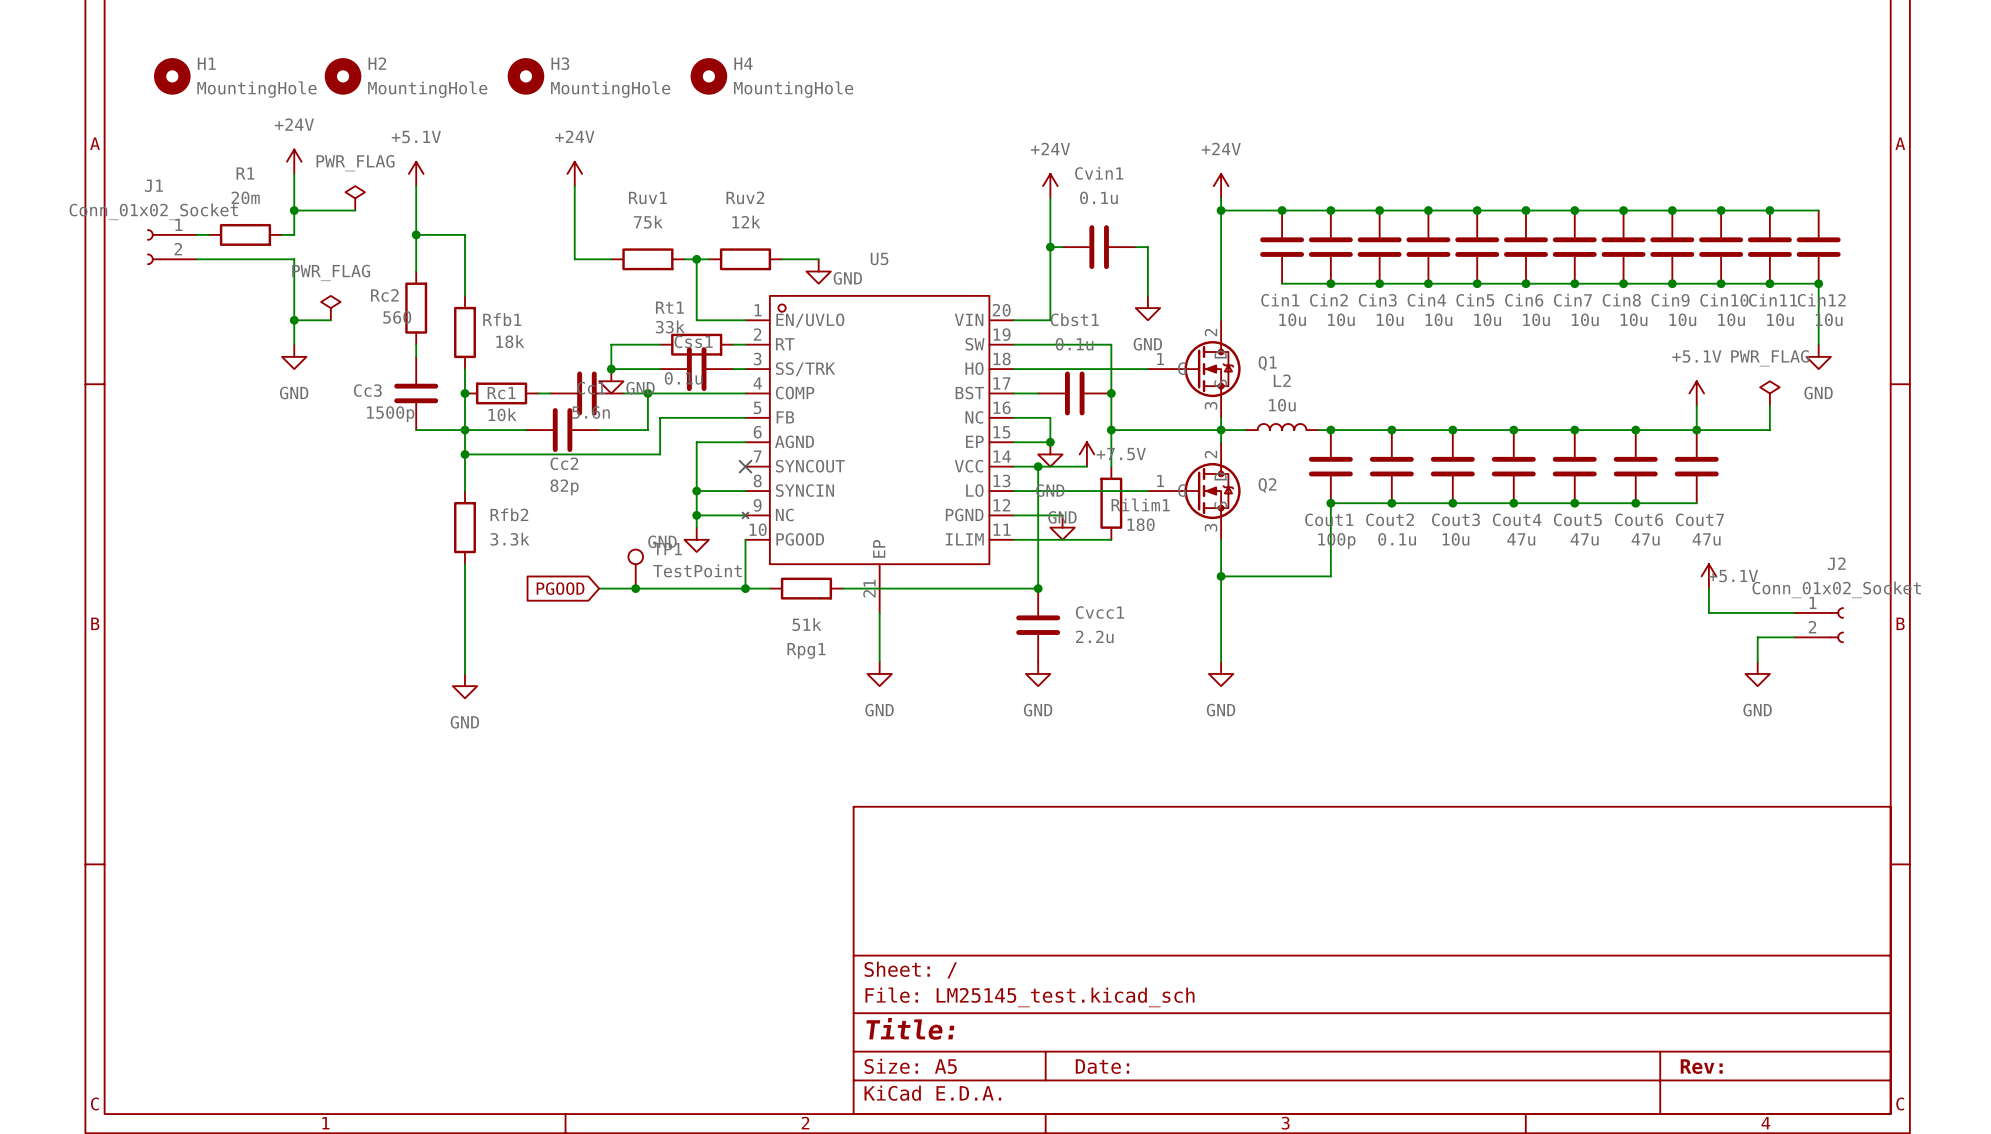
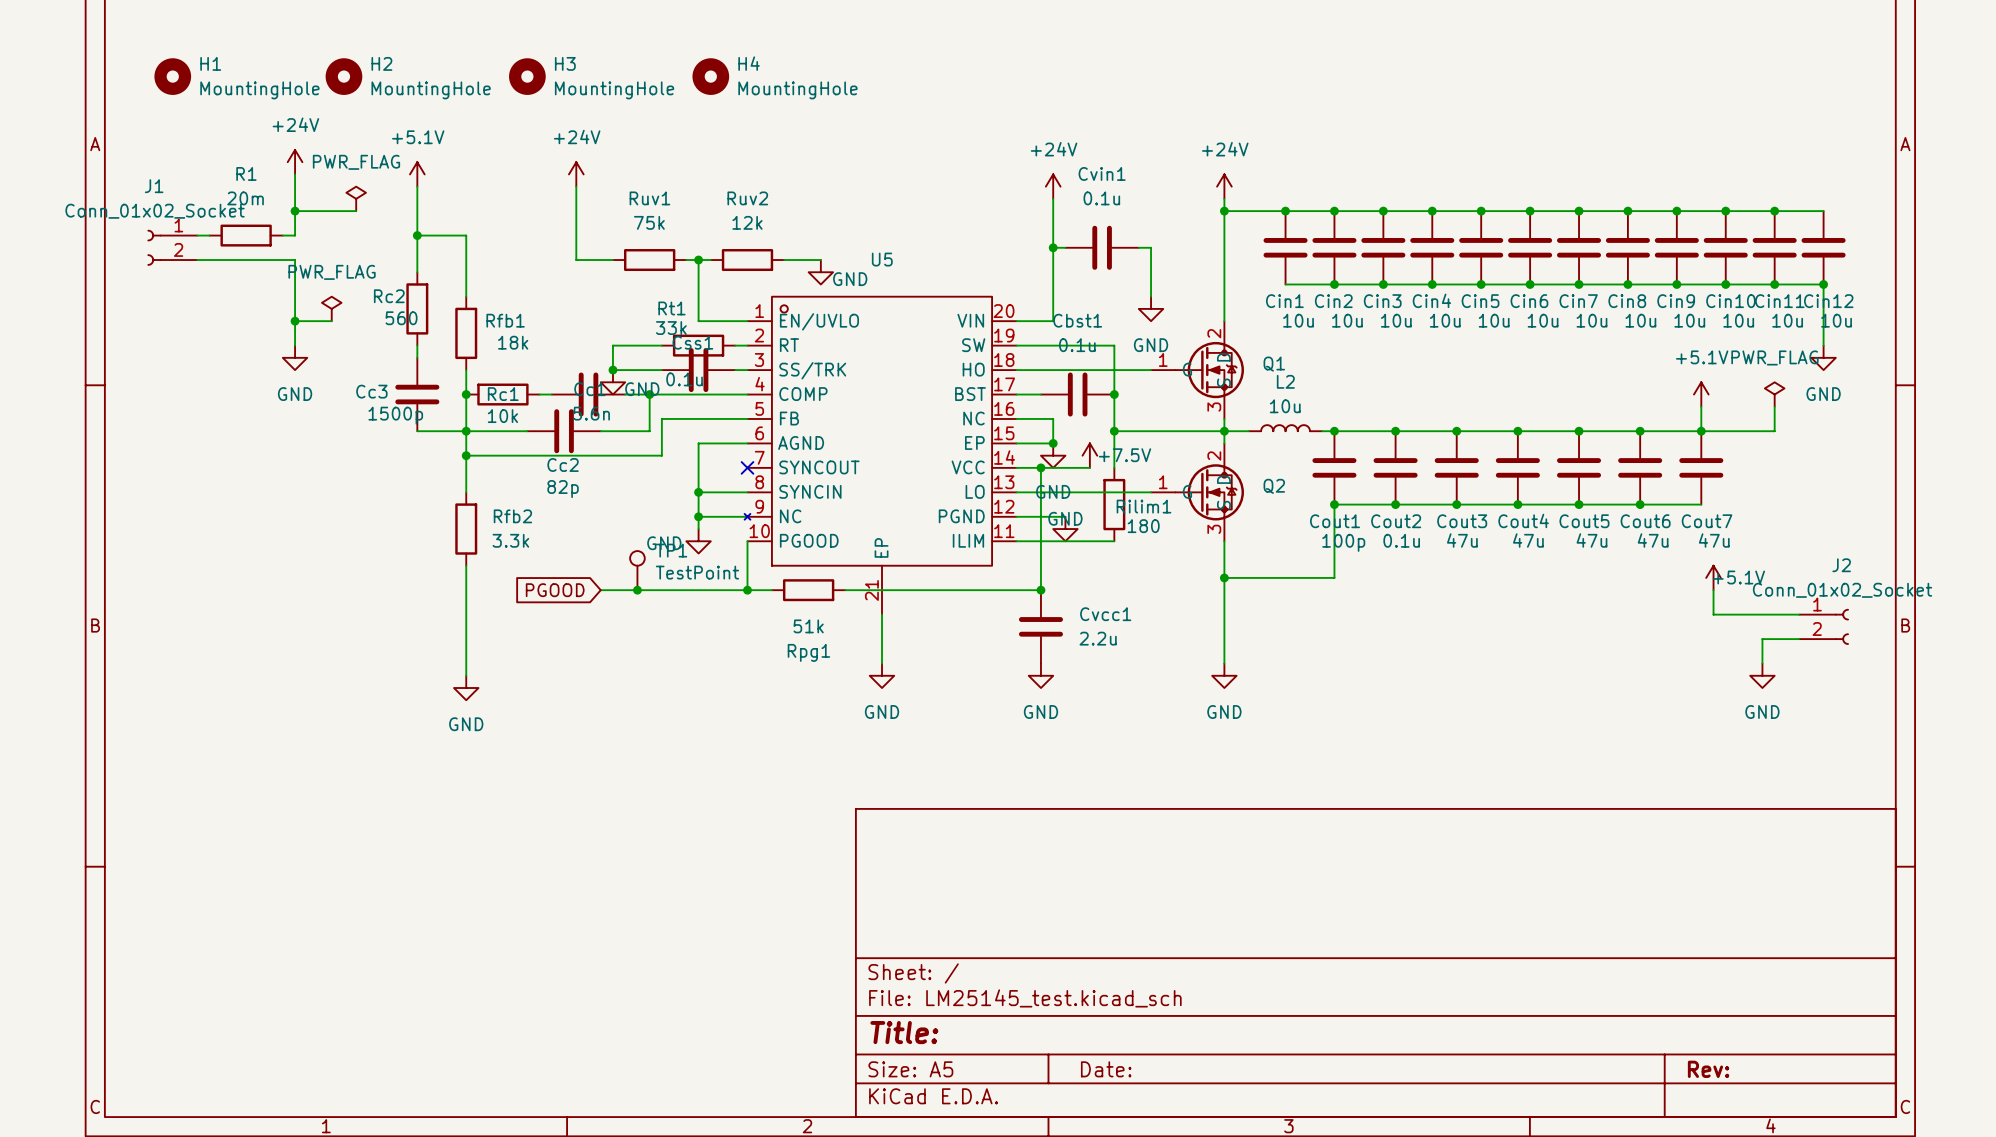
Cout3 value: 10u (1455, 539) -> 47u (1462, 540)

